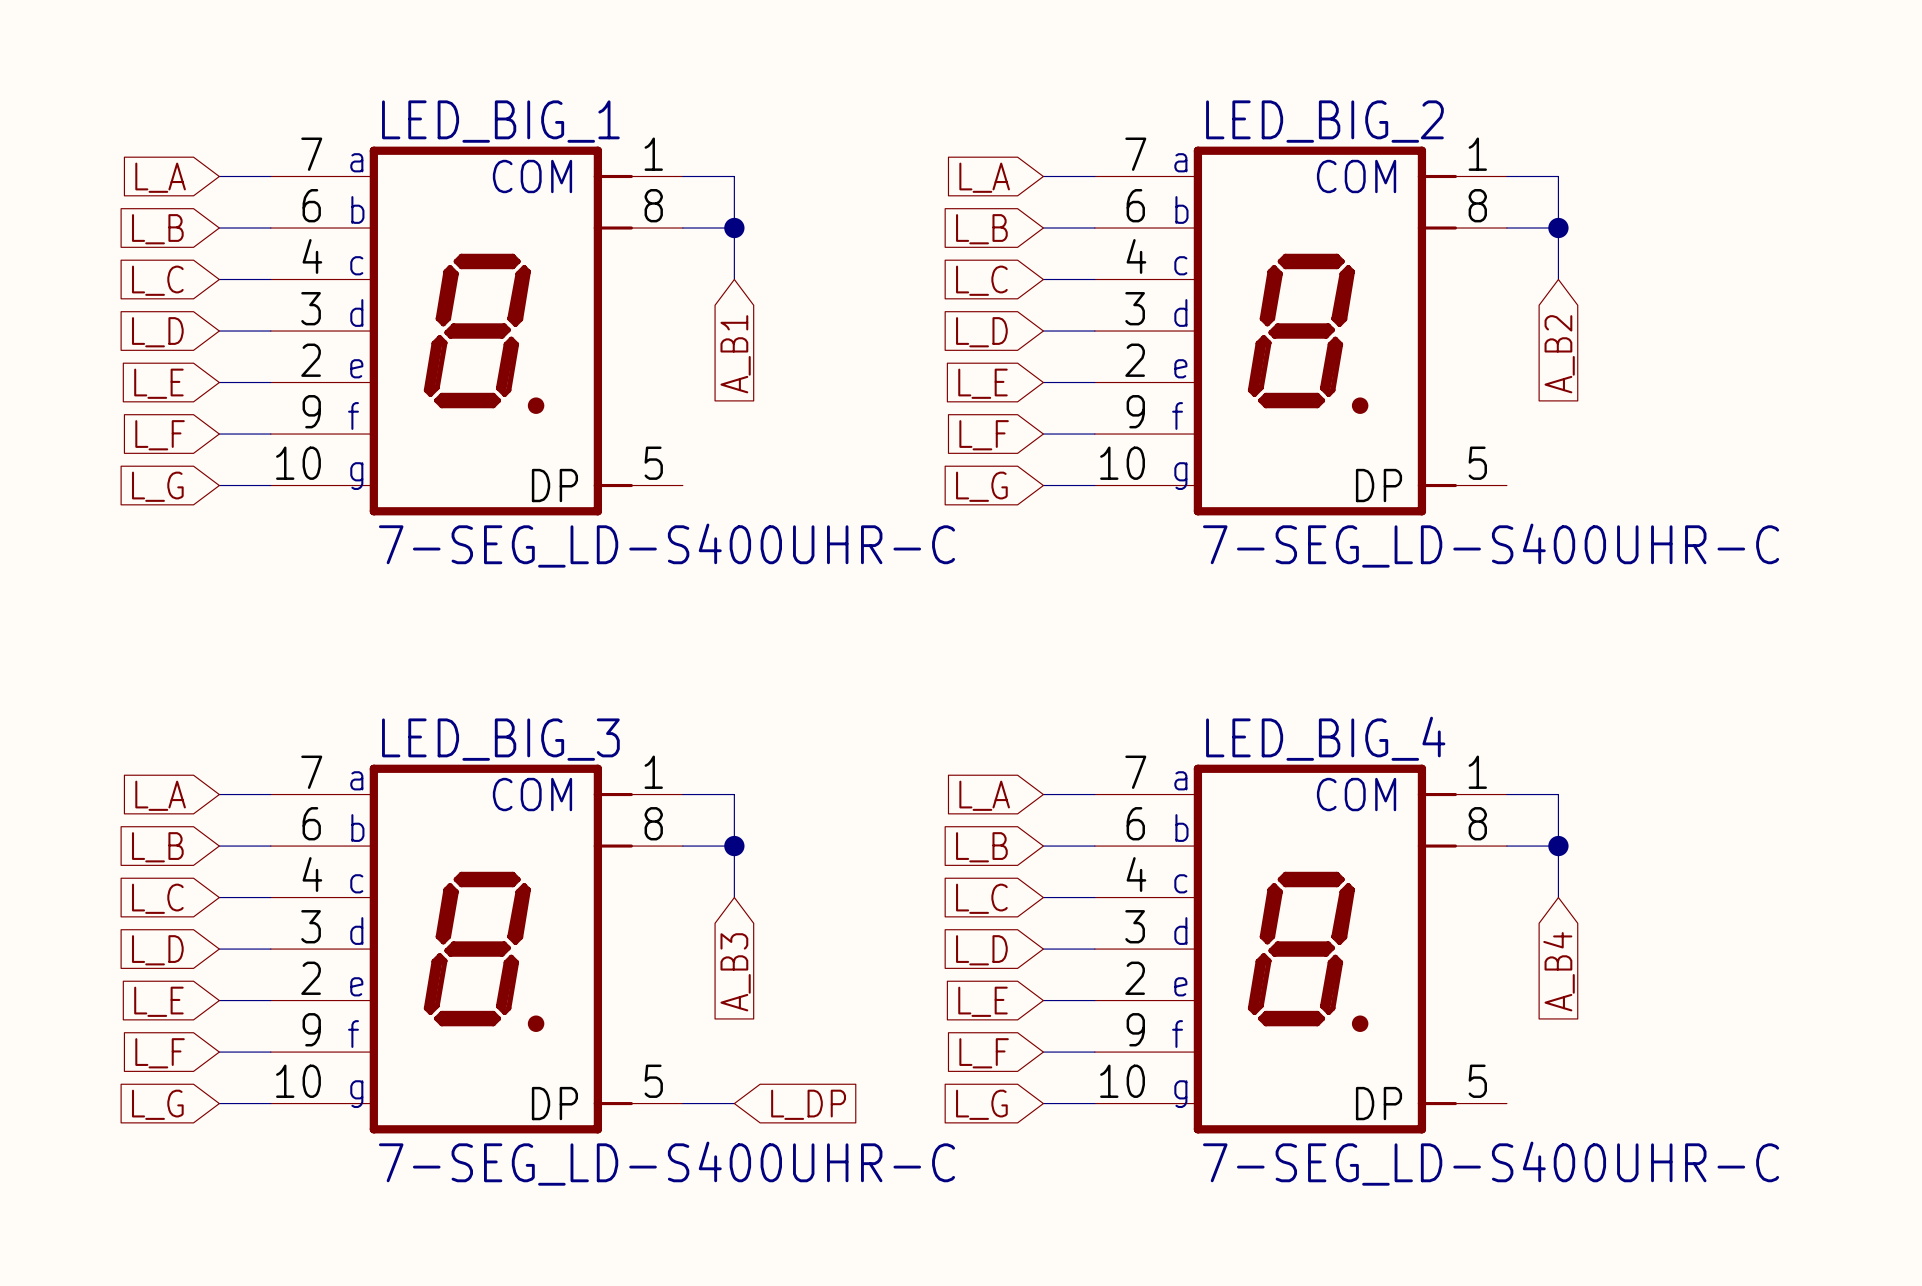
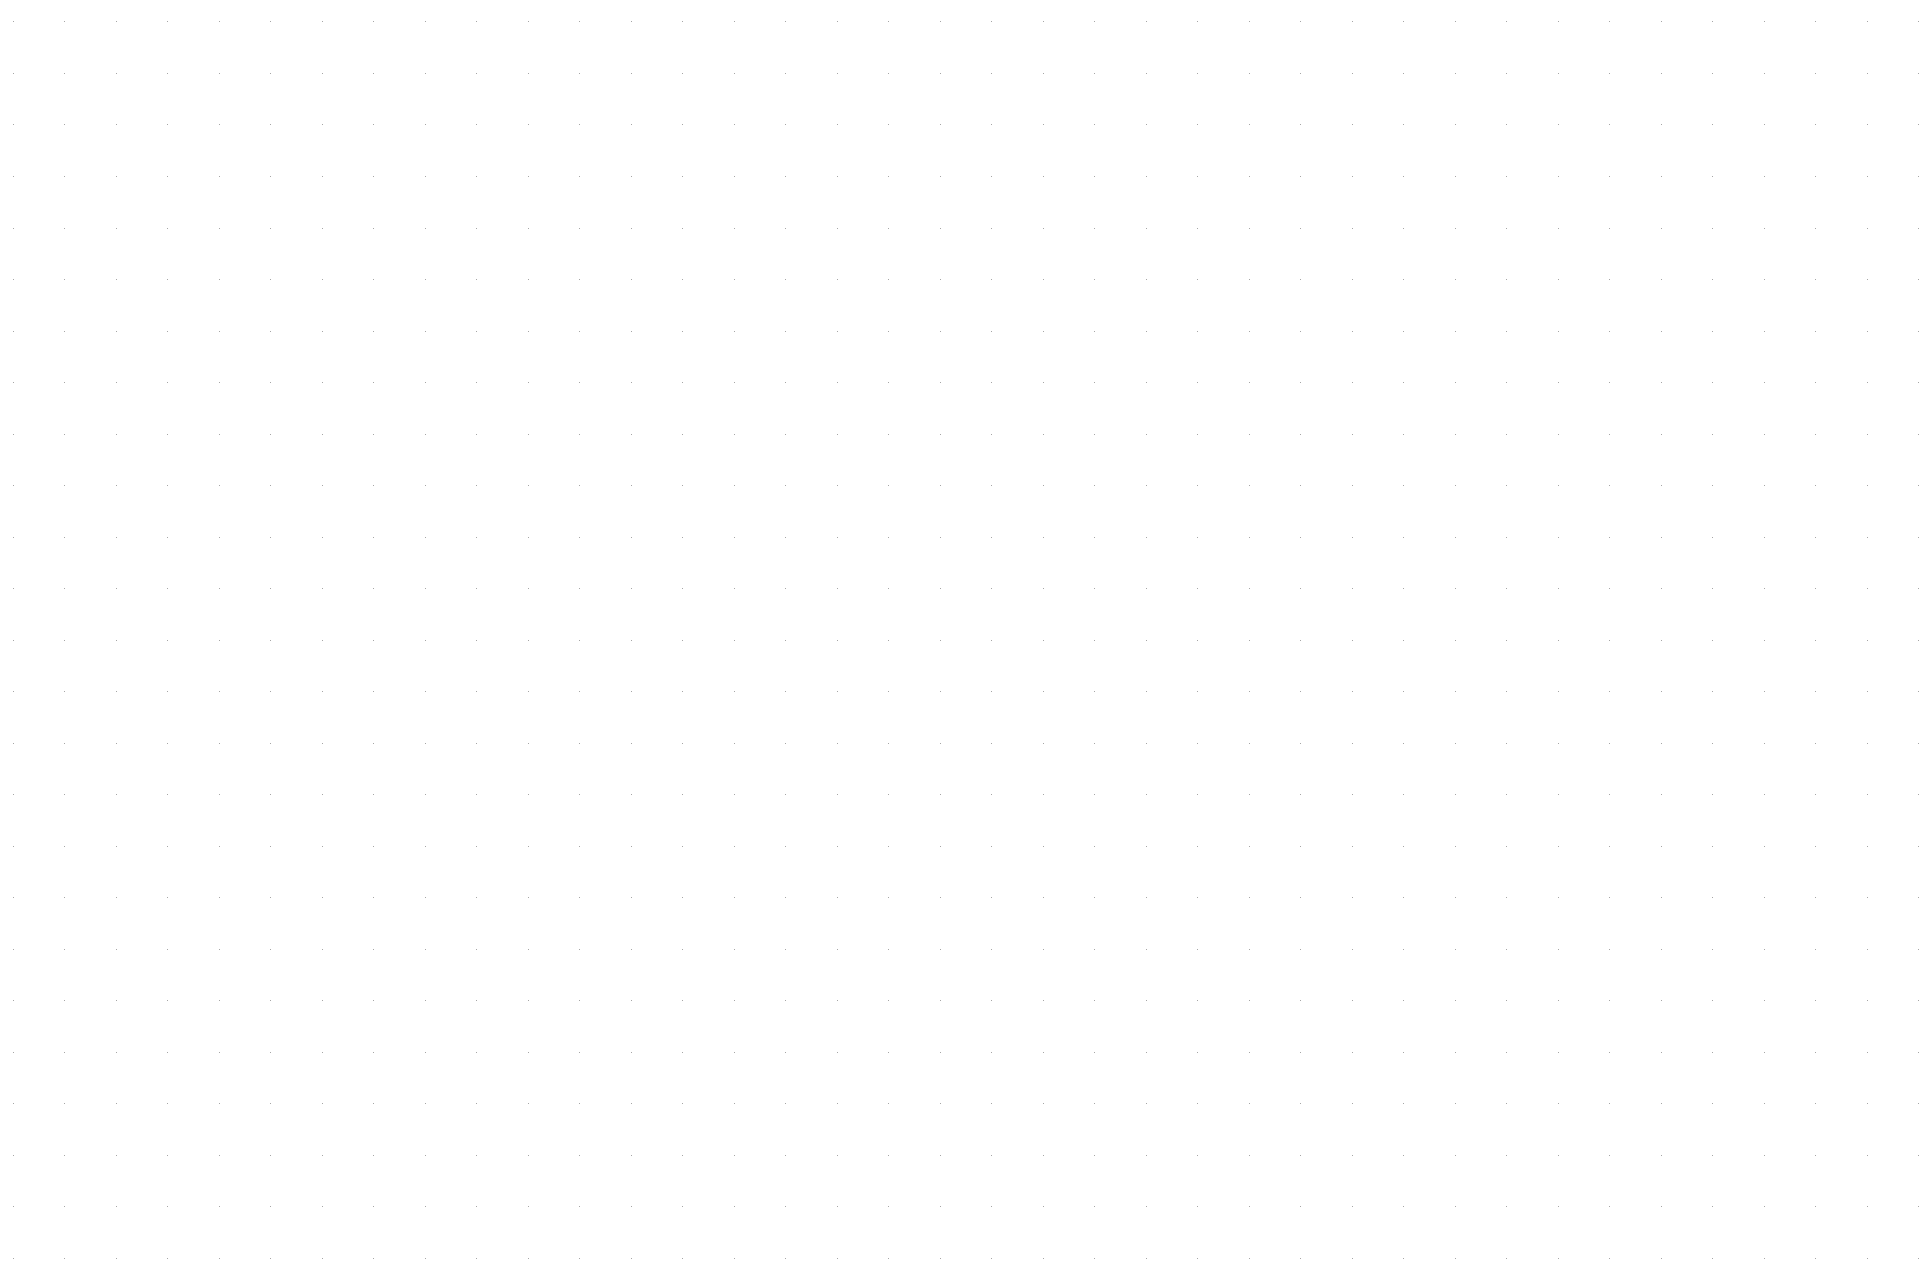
wire: (219, 176) (270, 176) -> none
wire: (682, 176) (734, 176) (734, 279) -> none
wire: (1043, 176) (1094, 176) -> none
wire: (1506, 176) (1558, 176) (1558, 279) -> none
global label: L_A (160, 177) -> none
global label: L_A (984, 177) -> none
wire: (219, 228) (270, 228) -> none
wire: (682, 228) (734, 228) -> none
junction: (734, 228) -> none
wire: (1043, 228) (1094, 228) -> none
wire: (1506, 228) (1558, 228) -> none
junction: (1558, 228) -> none
global label: L_B (157, 229) -> none
global label: L_B (981, 229) -> none
wire: (219, 279) (270, 279) -> none
wire: (1043, 279) (1094, 279) -> none
global label: L_C (157, 280) -> none
global label: L_C (981, 280) -> none
wire: (219, 331) (270, 331) -> none
LED_BIG_1: 7-SEG_LD-S400UHR-C (476, 331) -> none
wire: (1043, 331) (1094, 331) -> none
LED_BIG_2: 7-SEG_LD-S400UHR-C (1300, 331) -> none
global label: L_D (157, 332) -> none
global label: L_D (981, 332) -> none
global label: A_B1 (735, 354) -> none
global label: A_B2 (1559, 354) -> none
wire: (219, 382) (270, 382) -> none
wire: (1043, 382) (1094, 382) -> none
global label: L_E (158, 383) -> none
global label: L_E (982, 383) -> none
wire: (219, 434) (270, 434) -> none
wire: (1043, 434) (1094, 434) -> none
global label: L_F (160, 435) -> none
global label: L_F (984, 435) -> none
wire: (219, 485) (270, 485) -> none
wire: (1043, 485) (1094, 485) -> none
global label: L_G (157, 486) -> none
global label: L_G (981, 486) -> none
wire: (219, 794) (270, 794) -> none
wire: (682, 794) (734, 794) (734, 897) -> none
wire: (1043, 794) (1094, 794) -> none
wire: (1506, 794) (1558, 794) (1558, 897) -> none
global label: L_A (160, 795) -> none
global label: L_A (984, 795) -> none
wire: (219, 846) (270, 846) -> none
wire: (682, 846) (734, 846) -> none
junction: (734, 846) -> none
wire: (1043, 846) (1094, 846) -> none
wire: (1506, 846) (1558, 846) -> none
junction: (1558, 846) -> none
global label: L_B (157, 847) -> none
global label: L_B (981, 847) -> none
wire: (219, 897) (270, 897) -> none
wire: (1043, 897) (1094, 897) -> none
global label: L_C (157, 898) -> none
global label: L_C (981, 898) -> none
wire: (219, 949) (270, 949) -> none
LED_BIG_3: 7-SEG_LD-S400UHR-C (476, 949) -> none
wire: (1043, 949) (1094, 949) -> none
LED_BIG_4: 7-SEG_LD-S400UHR-C (1300, 949) -> none
global label: L_D (157, 950) -> none
global label: L_D (981, 950) -> none
global label: A_B4 (1559, 971) -> none
global label: A_B3 (735, 972) -> none
wire: (219, 1000) (270, 1000) -> none
wire: (1043, 1000) (1094, 1000) -> none
global label: L_E (158, 1001) -> none
global label: L_E (982, 1001) -> none
wire: (219, 1052) (270, 1052) -> none
wire: (1043, 1052) (1094, 1052) -> none
global label: L_F (160, 1053) -> none
global label: L_F (984, 1053) -> none
wire: (219, 1103) (270, 1103) -> none
wire: (682, 1103) (734, 1103) -> none
wire: (1043, 1103) (1094, 1103) -> none
global label: L_G (157, 1104) -> none
global label: L_DP (808, 1104) -> none
global label: L_G (981, 1104) -> none

